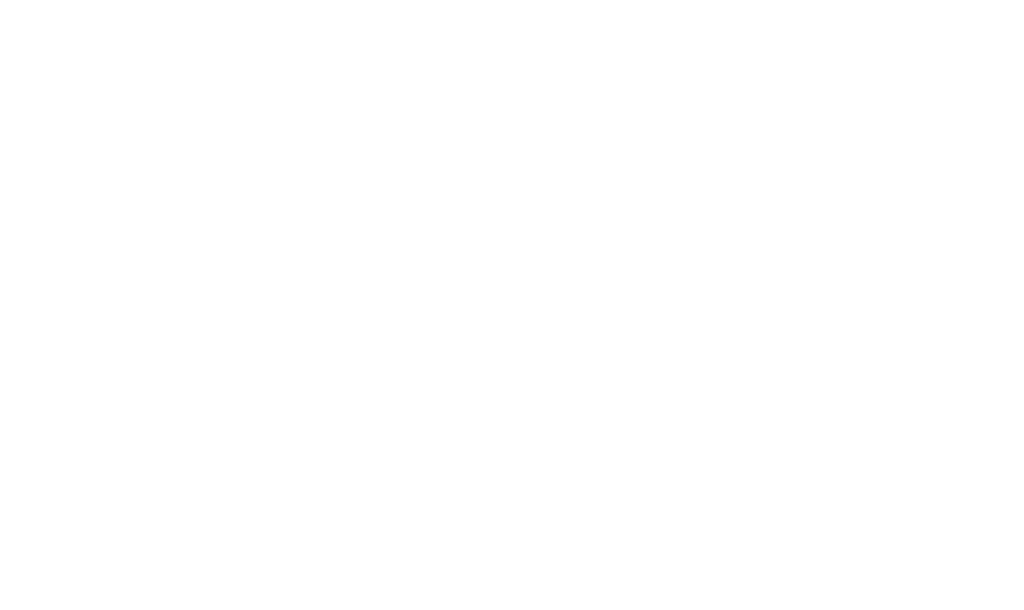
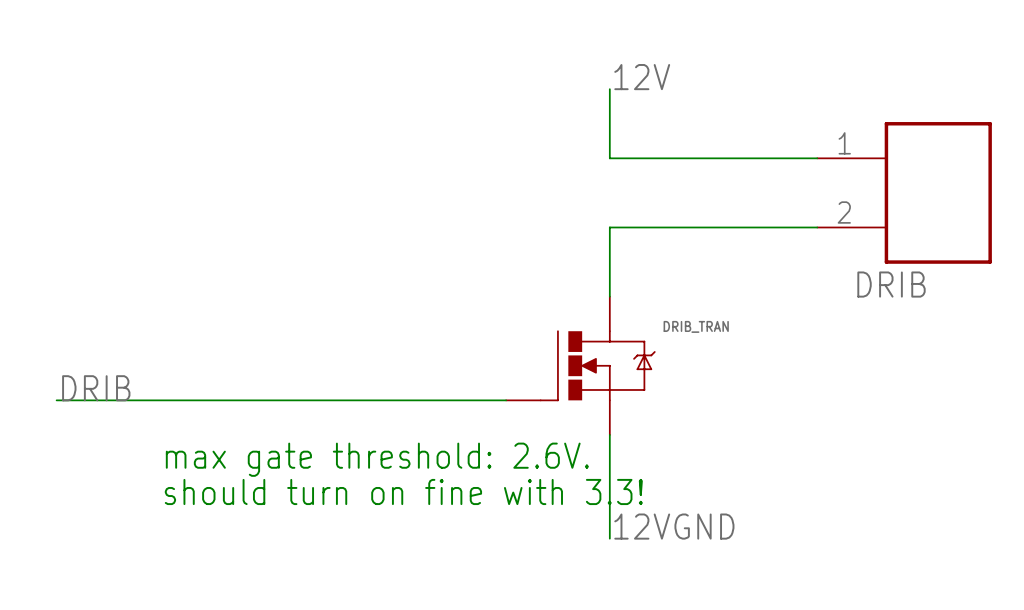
label: none -> 12V (642, 77)
wire: none -> (609, 89) (609, 158) (817, 158)
DRIB: none -> (904, 192)
wire: none -> (817, 227) (609, 227) (609, 296)
DRIB_TRAN: none -> (580, 365)
label: none -> DRIB (96, 388)
wire: none -> (56, 400) (506, 400)
wire: none -> (609, 434) (609, 538)
text: none -> max gate threshold: 2.6V. (377, 459)
text: none -> should turn on fine with 3.3! (403, 491)
label: none -> 12VGND (674, 526)

